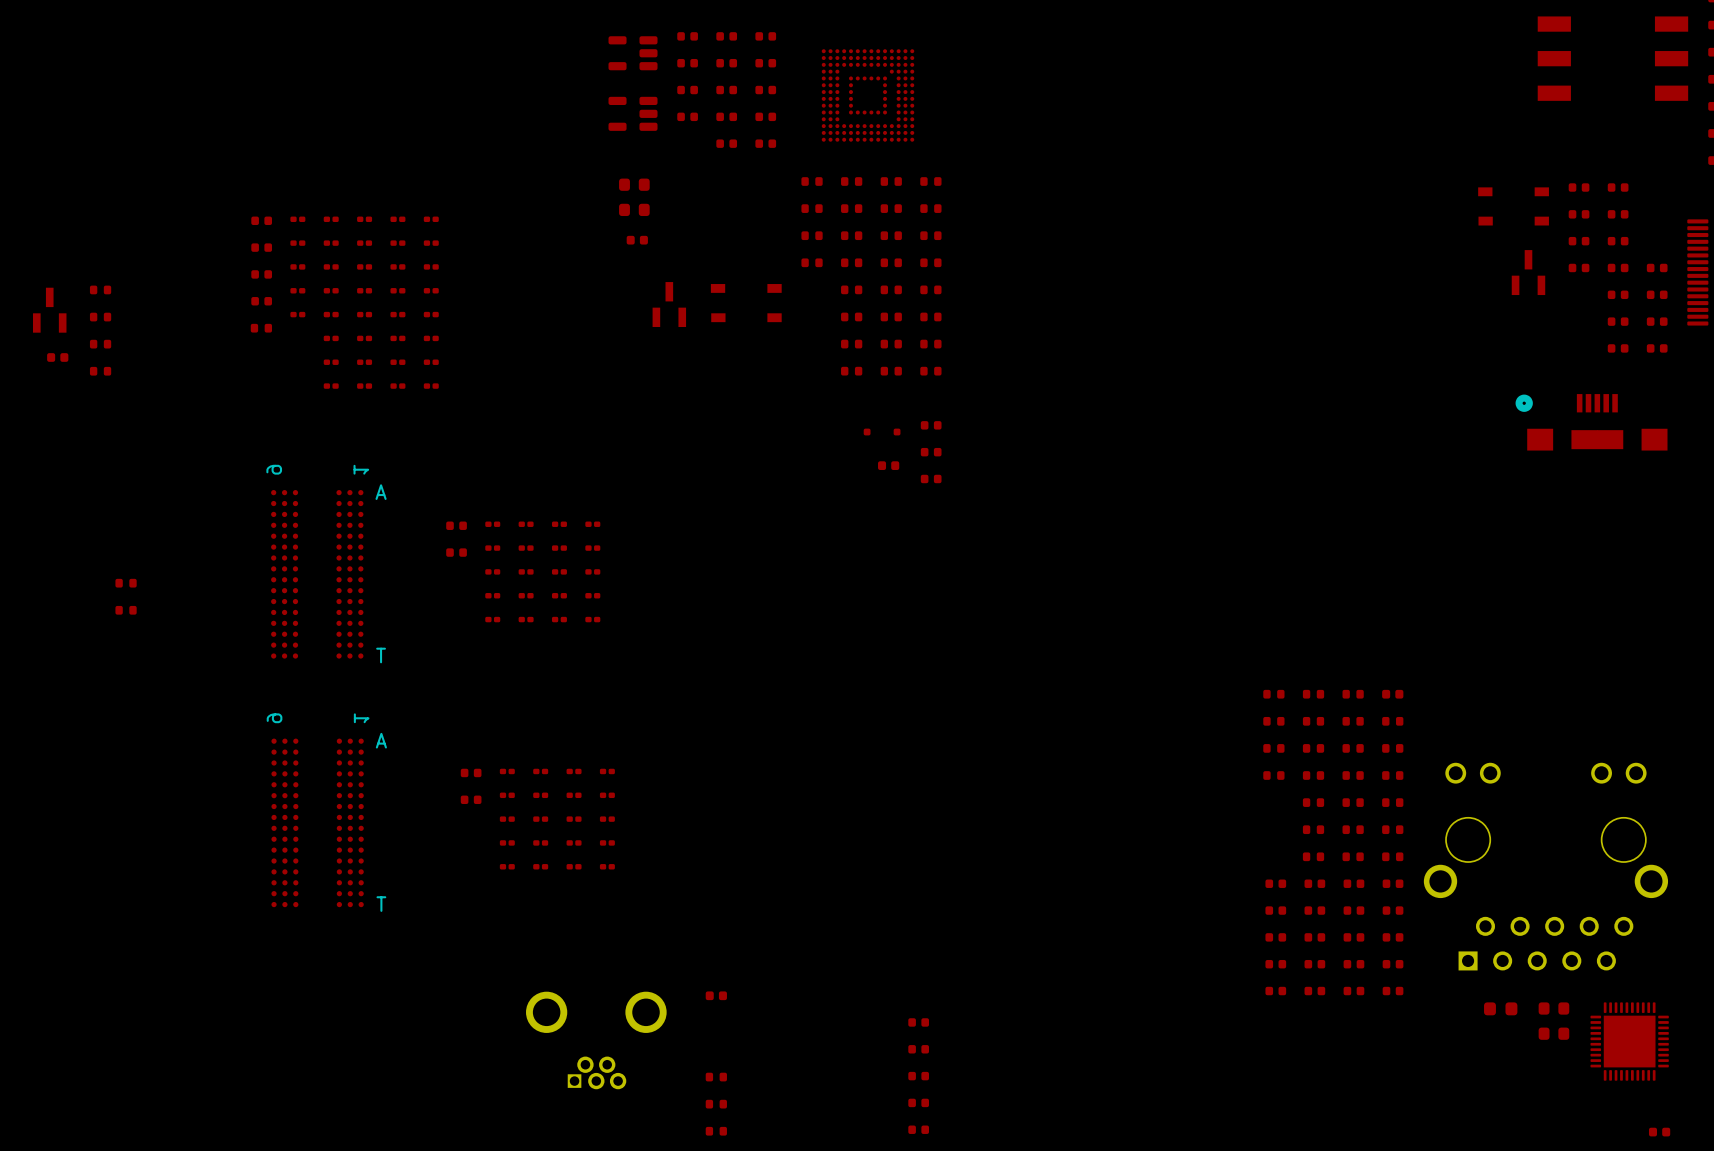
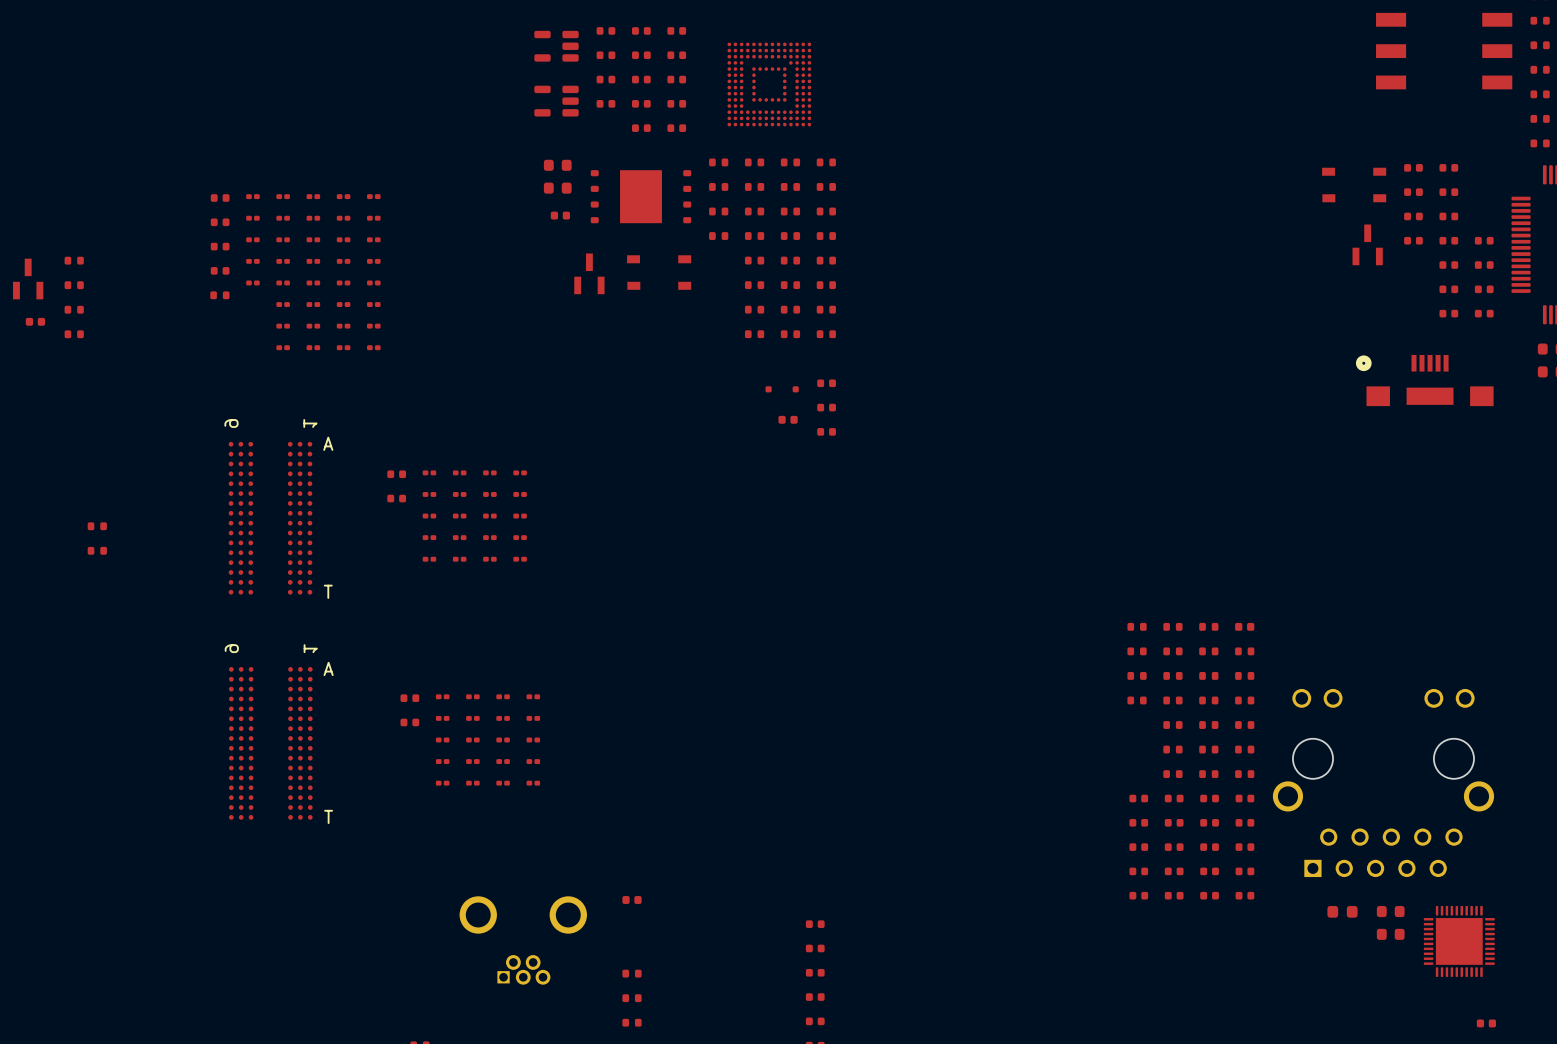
part: none -> (640, 196)

